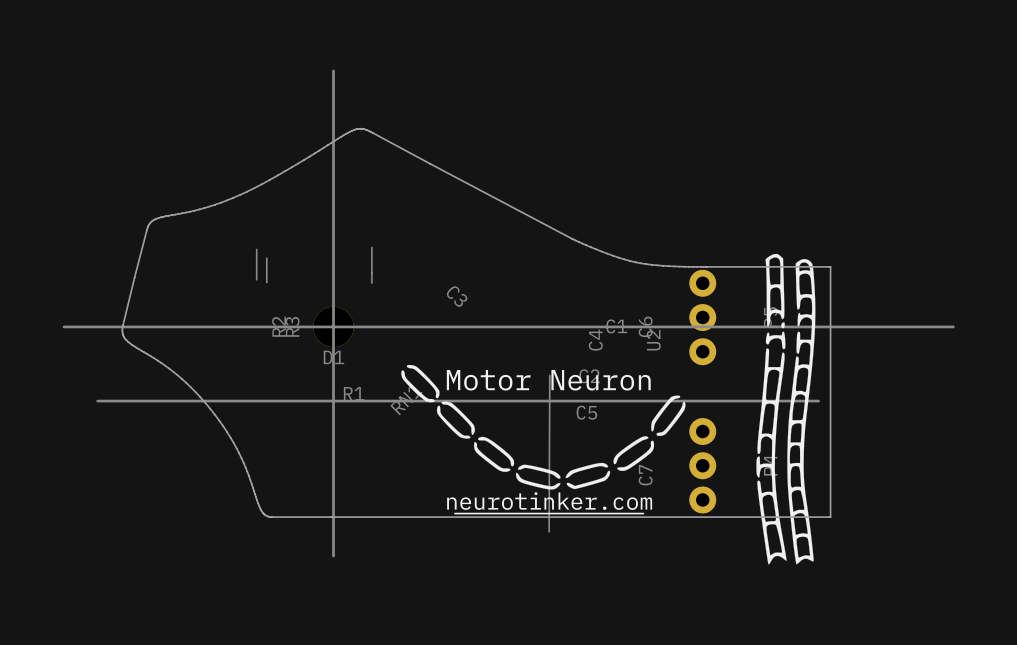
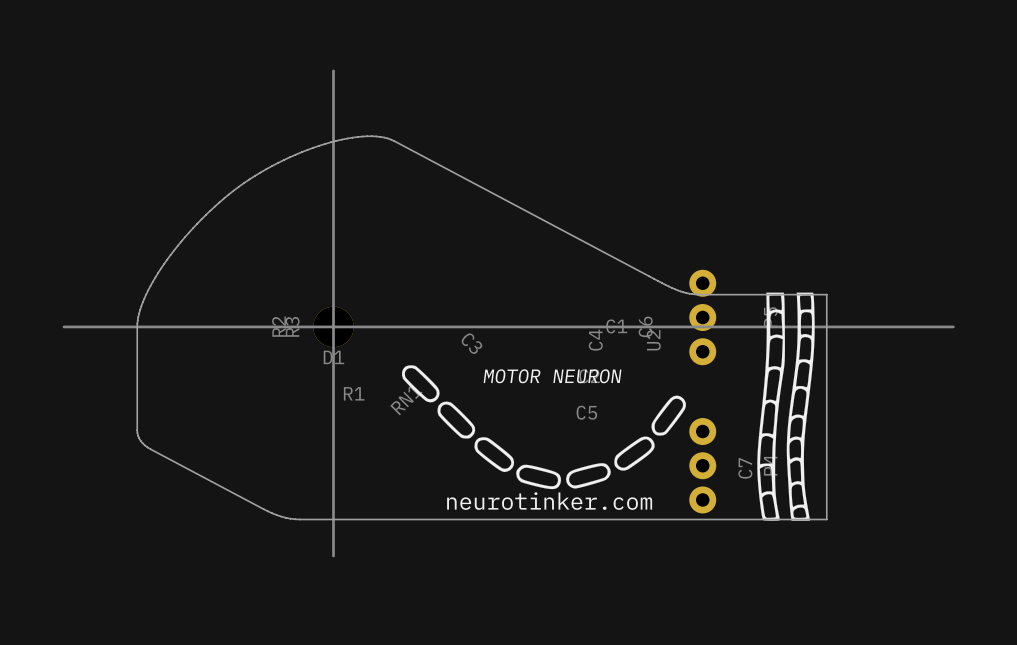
board edge: (360, 128) (371, 132) (571, 238) (624, 259) (646, 264) (679, 266) (830, 266) (830, 517) (271, 517) (265, 515) (259, 507) (236, 448) (210, 408) (177, 375) (131, 344) (124, 337) (122, 327) (134, 277) (147, 227) (153, 220) (204, 208) (240, 194) (284, 171) (347, 132) (360, 128) -> (367, 136) (341, 139) (313, 147) (283, 160) (254, 175) (210, 210) (189, 232) (167, 259) (146, 294) (137, 320) (137, 430) (139, 438) (144, 445) (267, 511) (295, 519) (826, 519) (826, 294) (698, 294) (680, 291) (394, 141) (384, 137) (367, 136)
line: (371, 247) (371, 283) -> none
line: (256, 249) (256, 279) -> none
drawing shape: [401, 253, 816, 565] -> [401, 292, 815, 521]
line: (266, 258) (266, 282) -> none
C3 position: (457, 296) -> (471, 343)
line: (549, 375) (549, 531) -> none
text: Motor Neuron (548, 380) -> MOTOR NEURON (552, 376)
line: (97, 401) (818, 401) -> none
C7 position: (645, 475) -> (745, 468)
line: (454, 513) (643, 513) -> none

